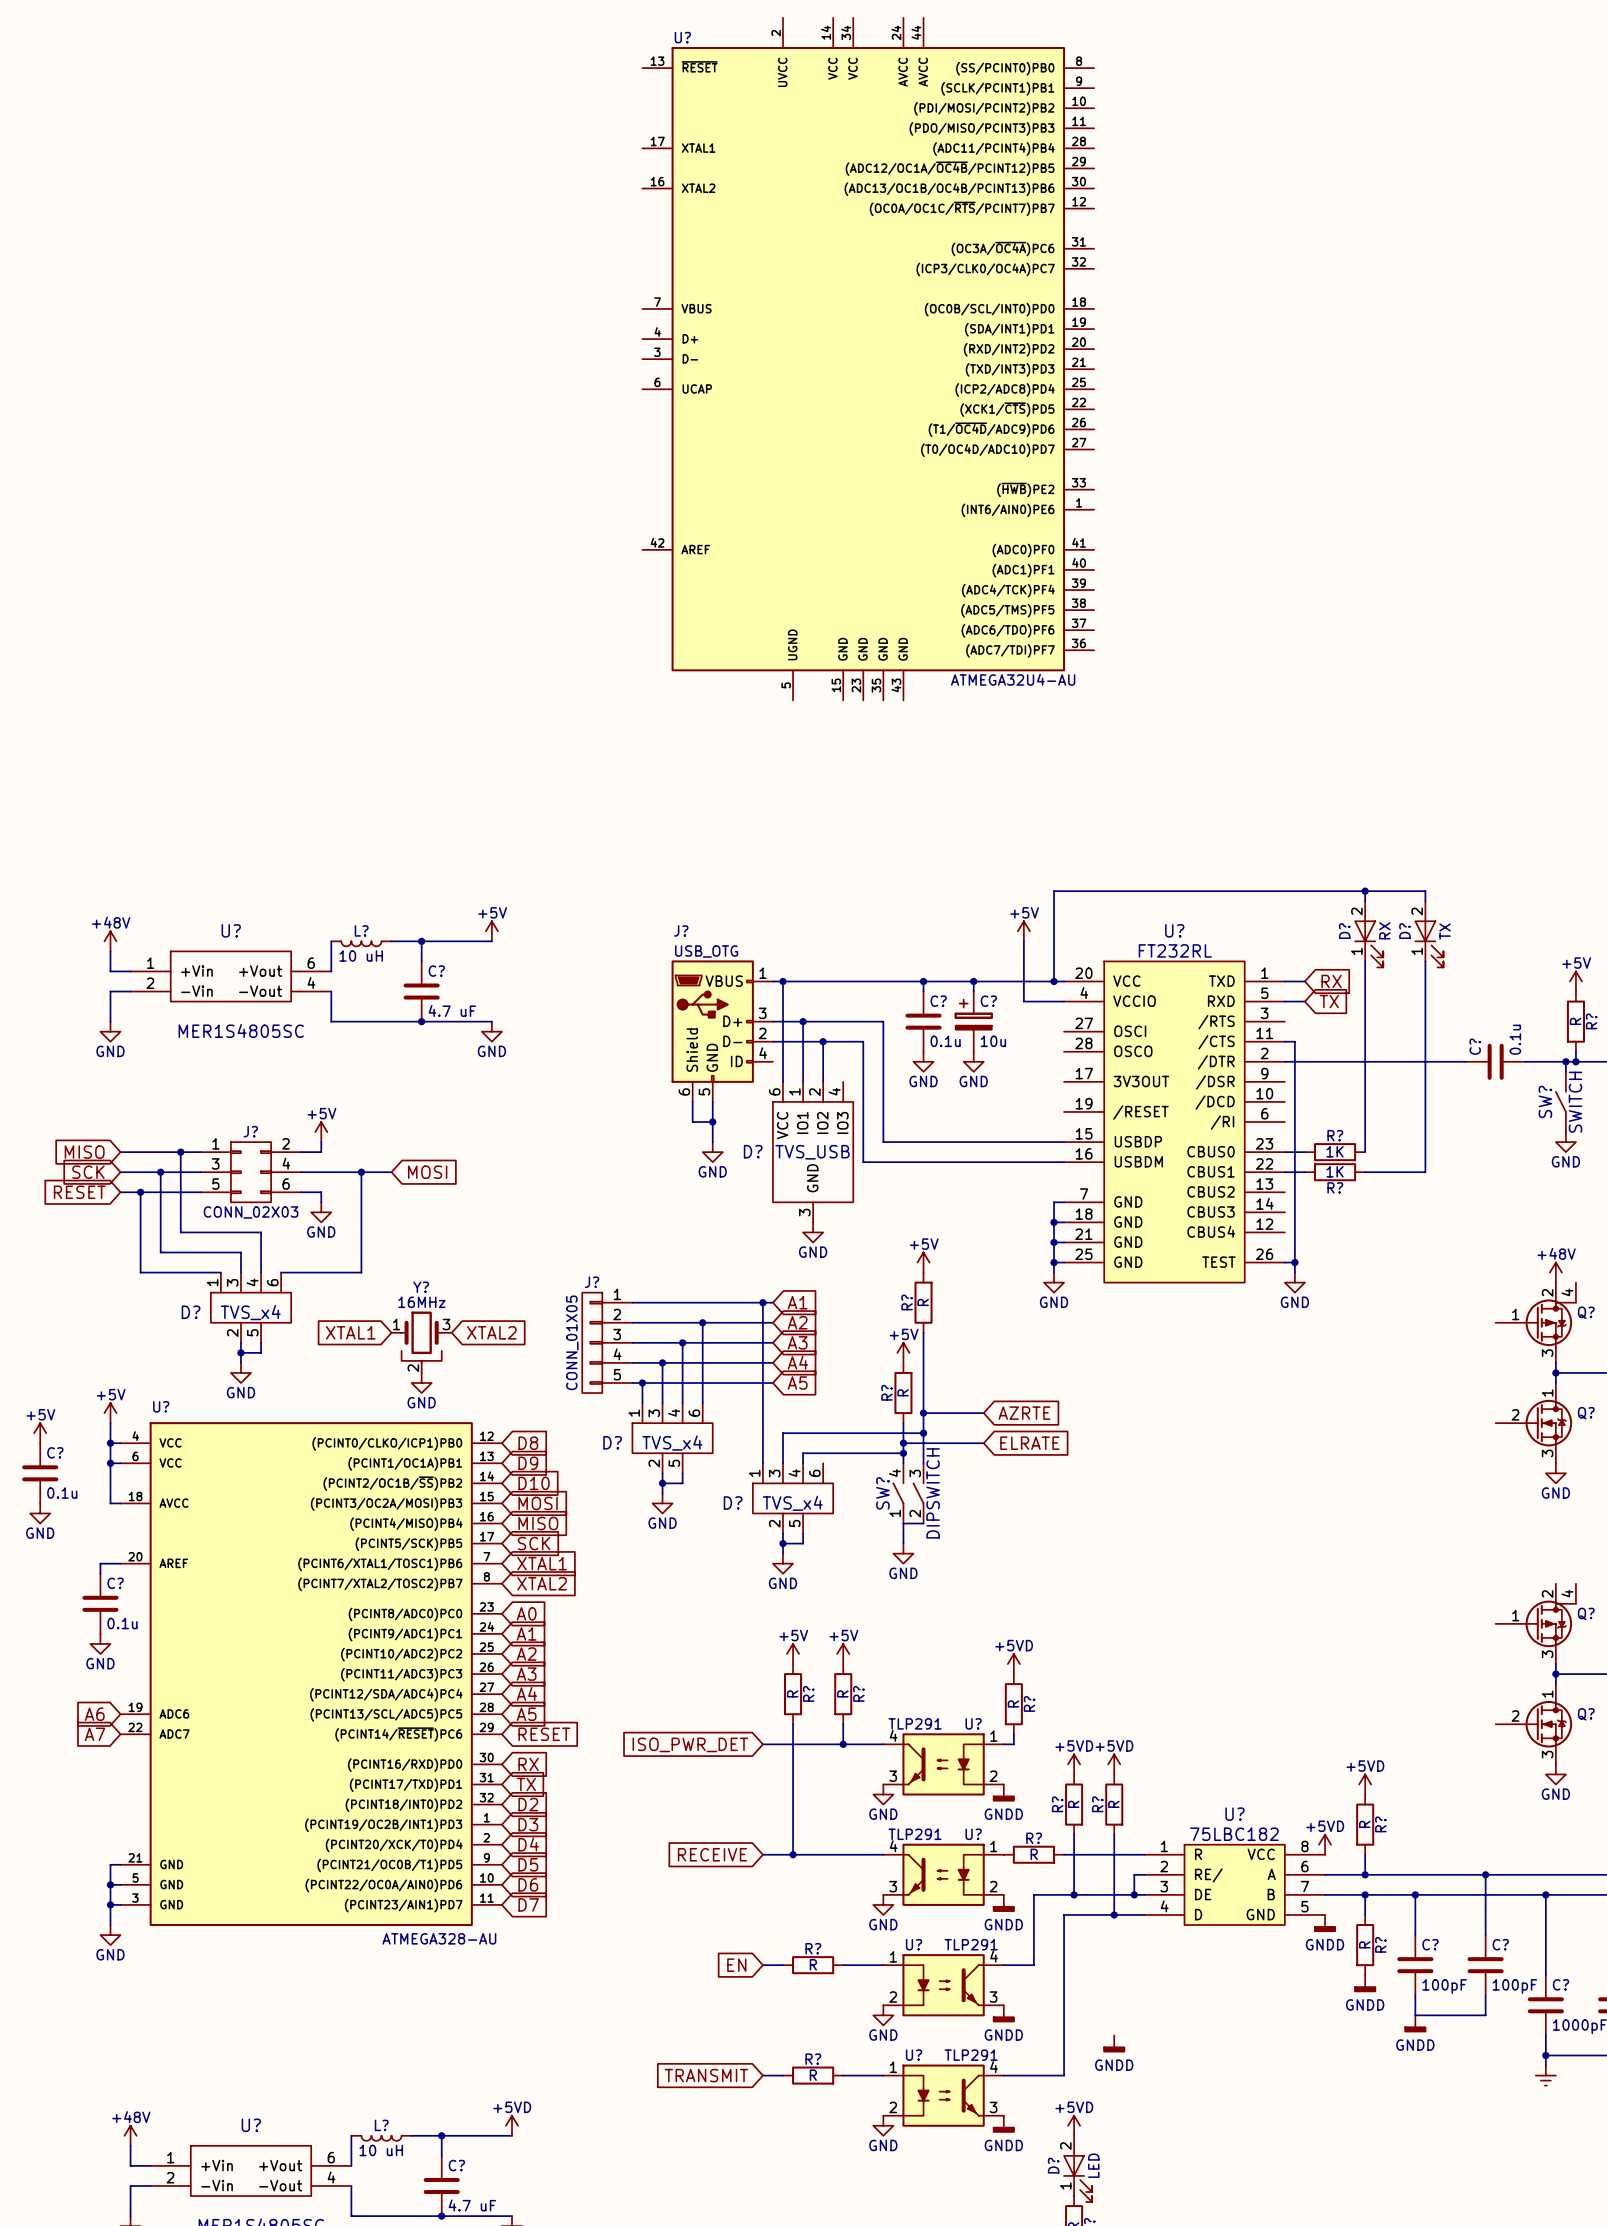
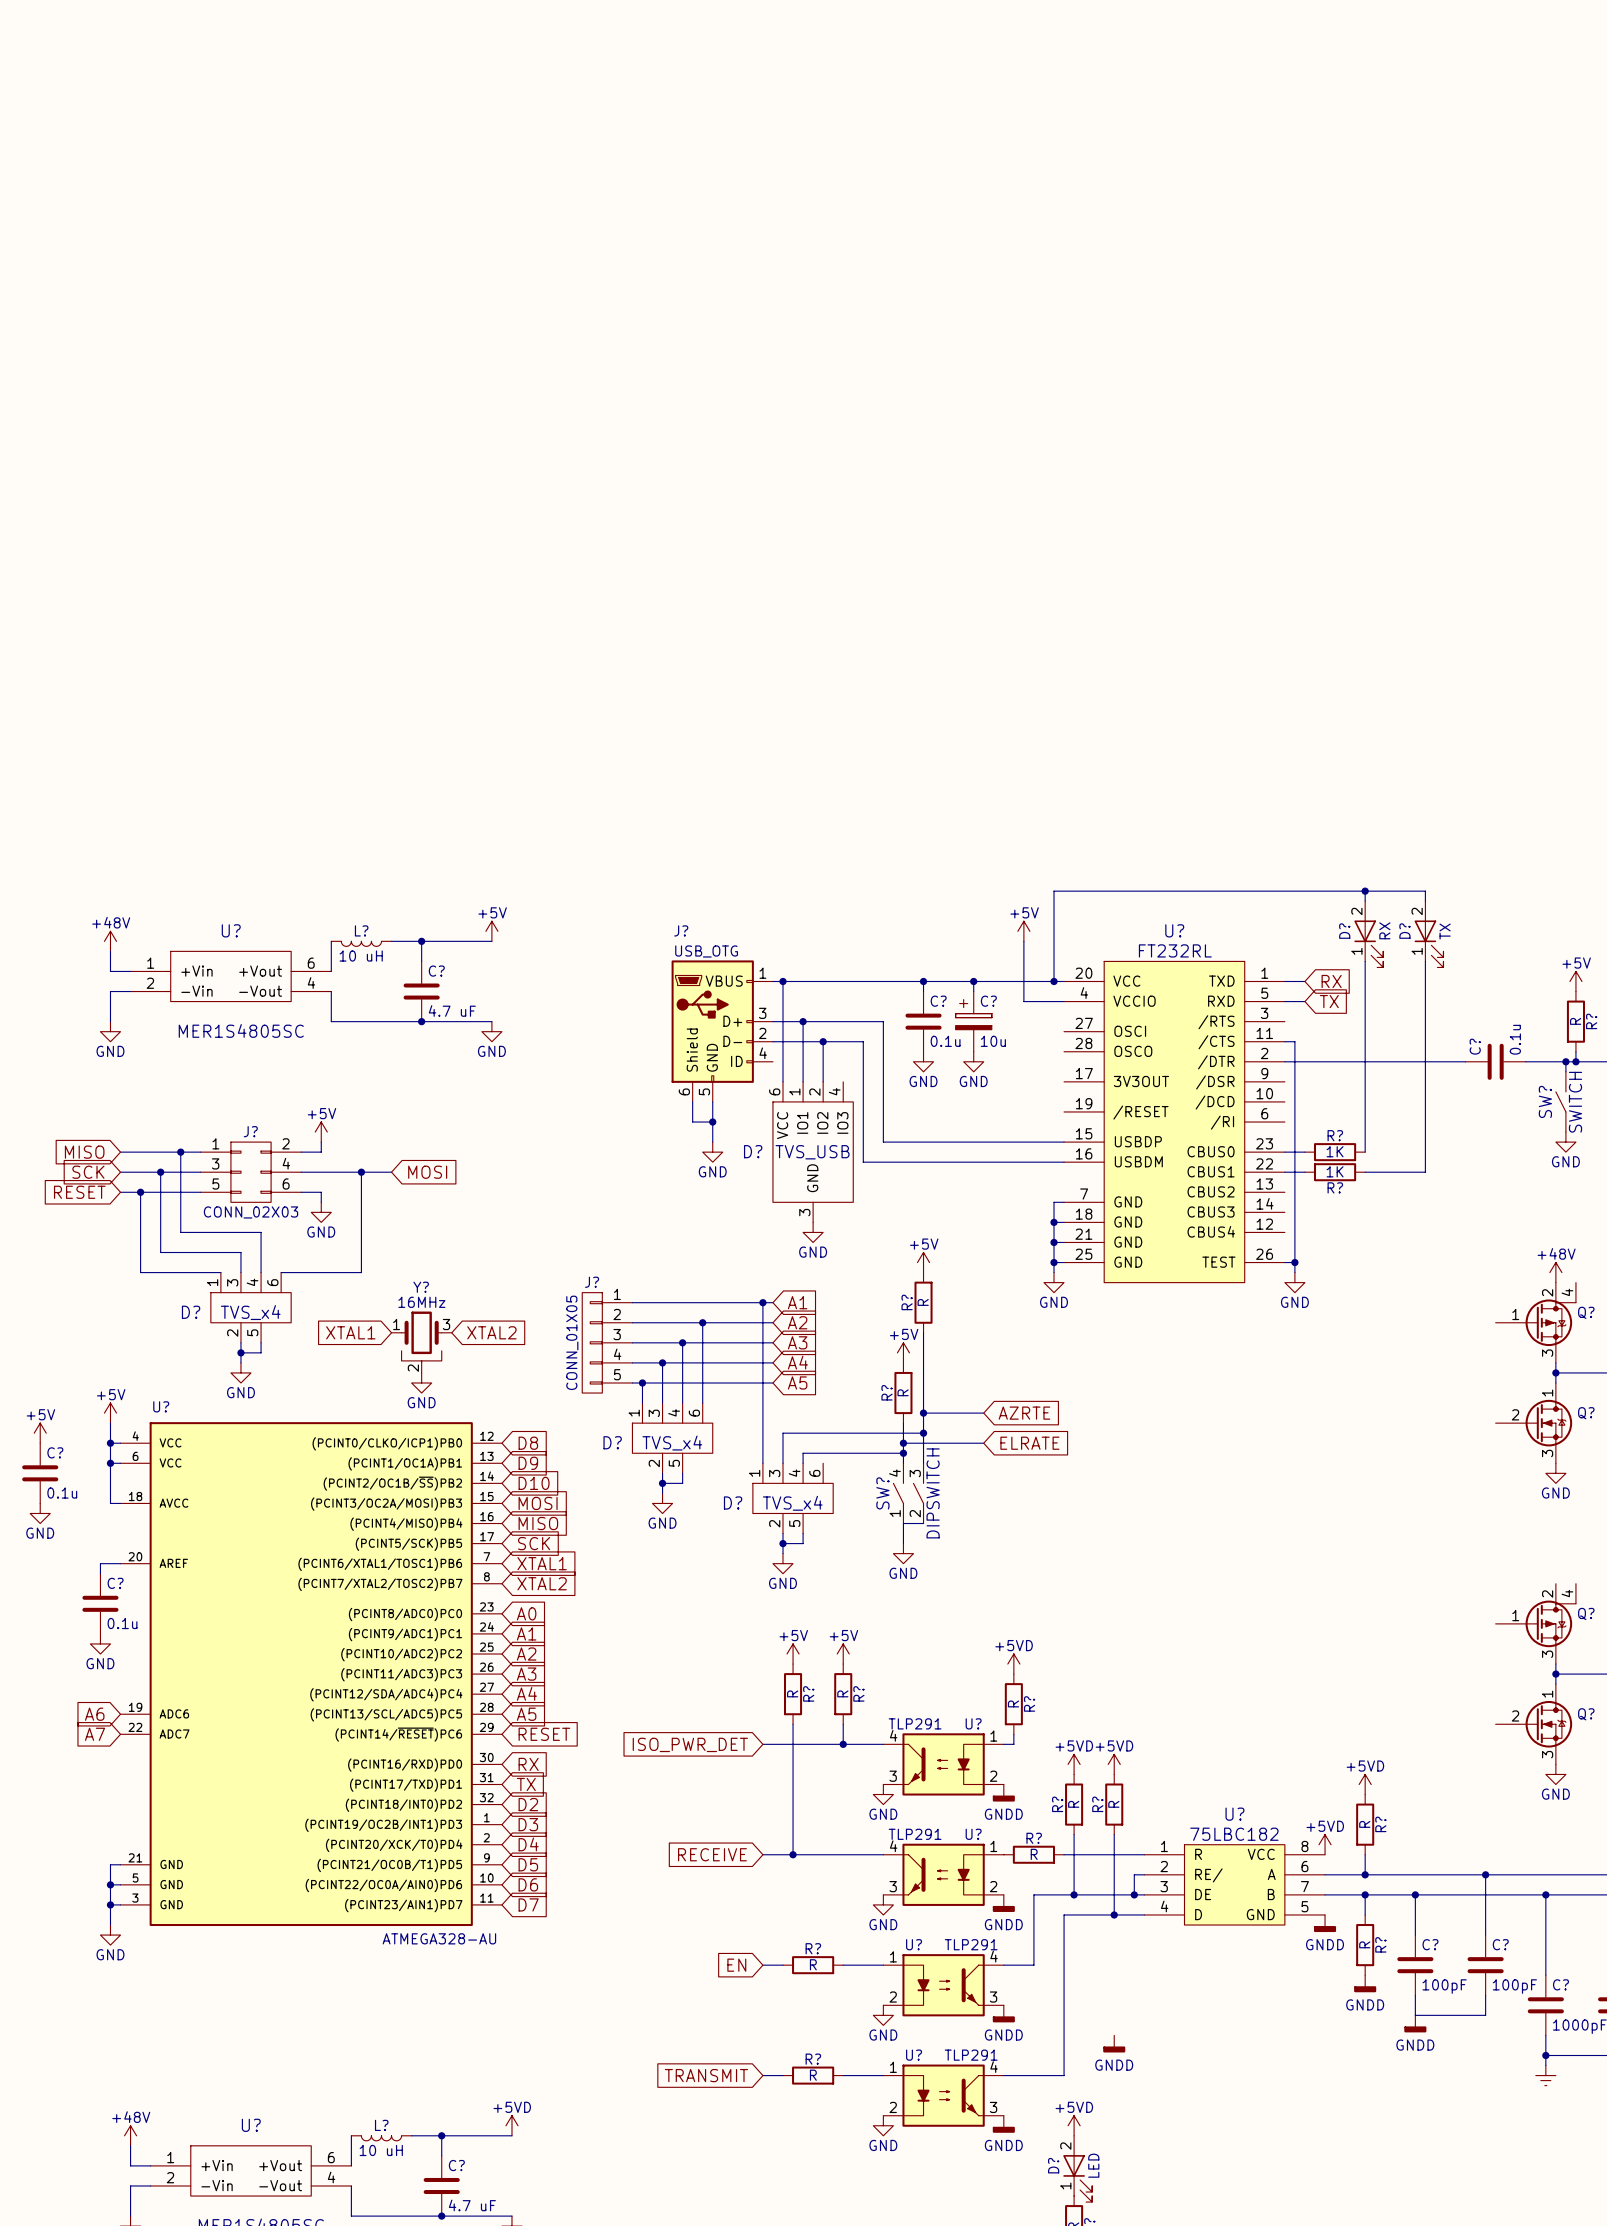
U?: ATMEGA32U4-AU (868, 359) -> none

